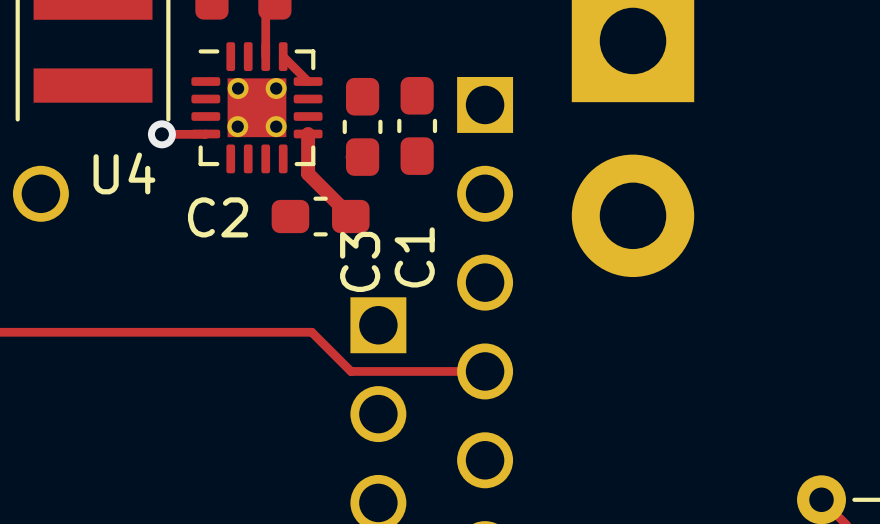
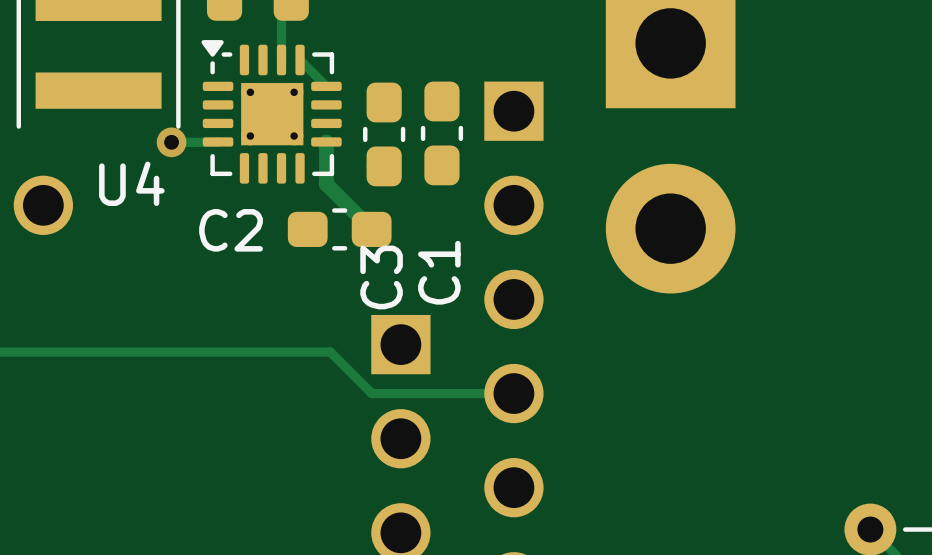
U4 footprint: [191, 42, 323, 174] -> [201, 40, 342, 184]

